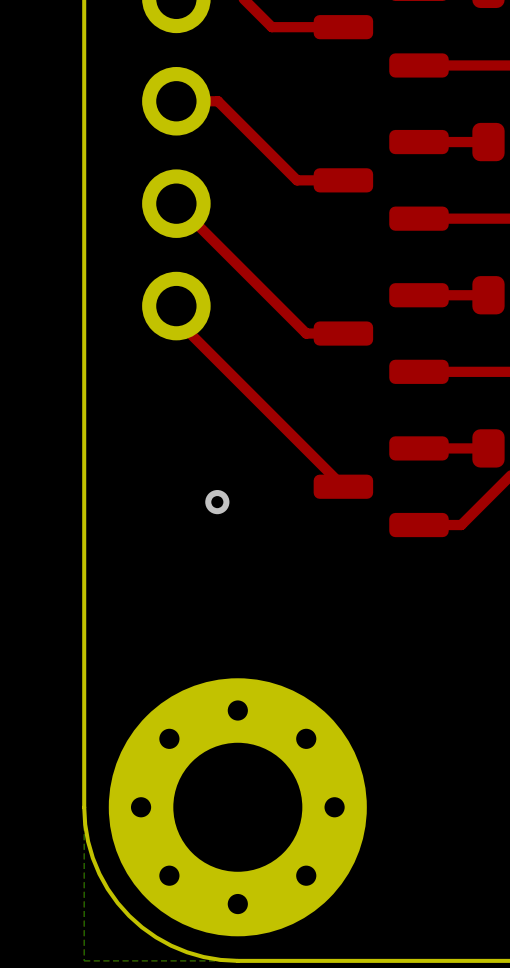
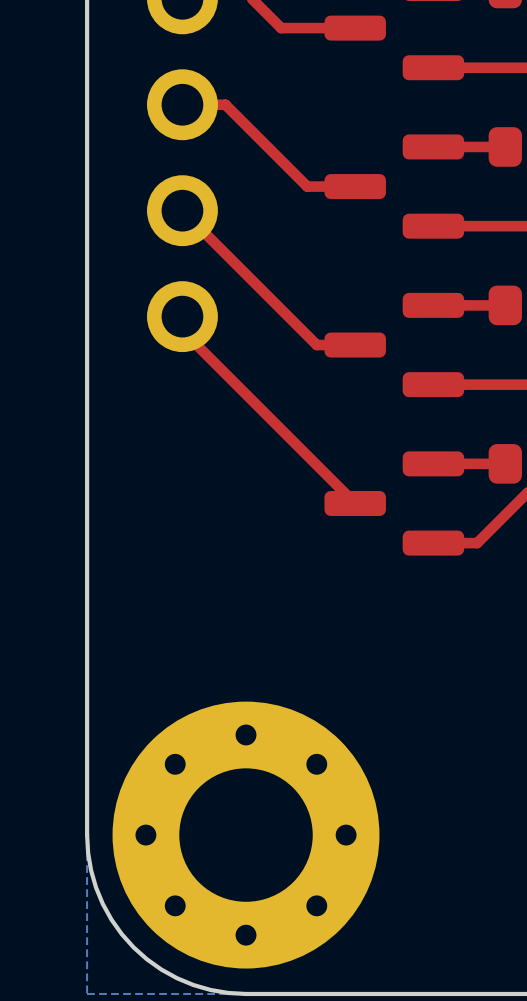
via: (217, 502) -> none

